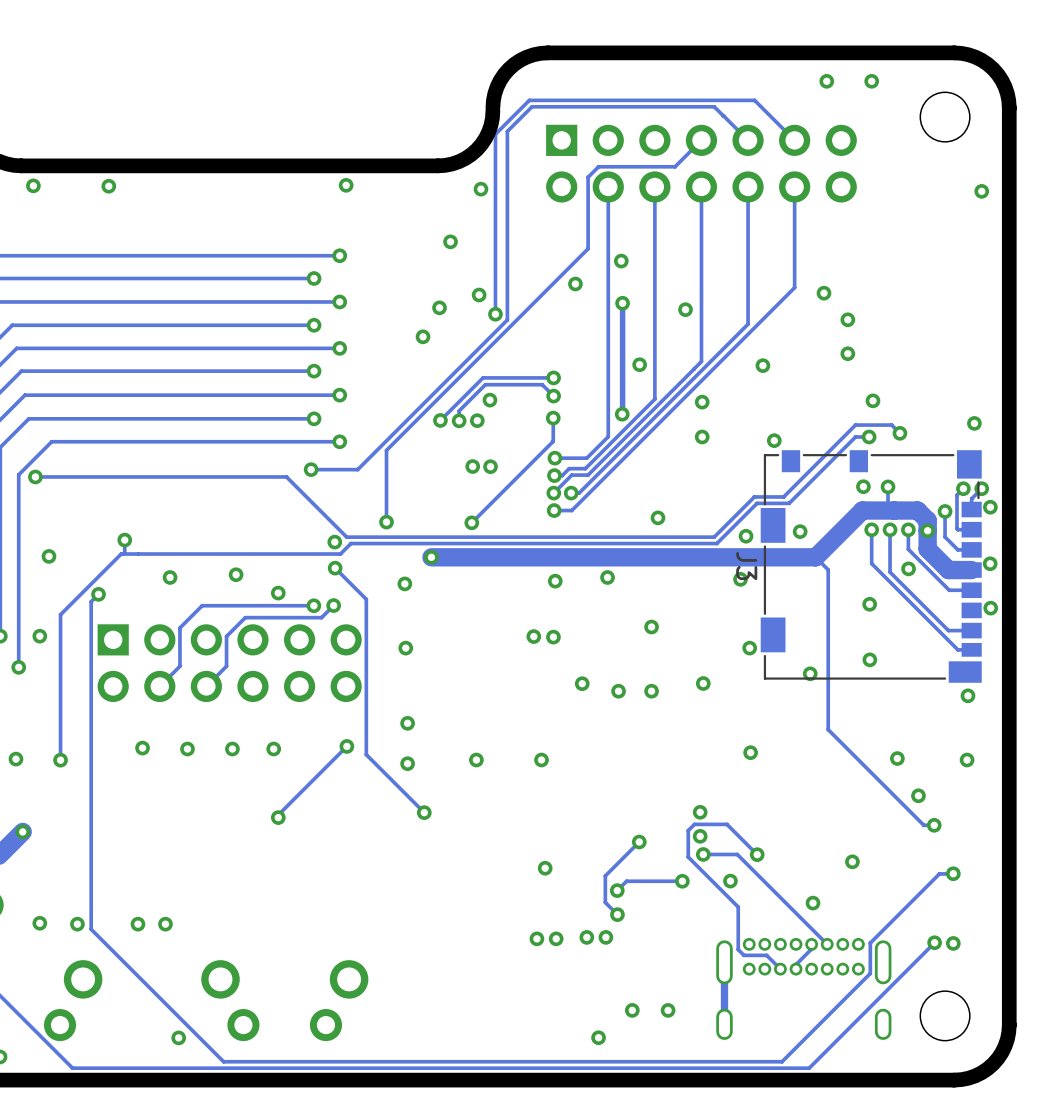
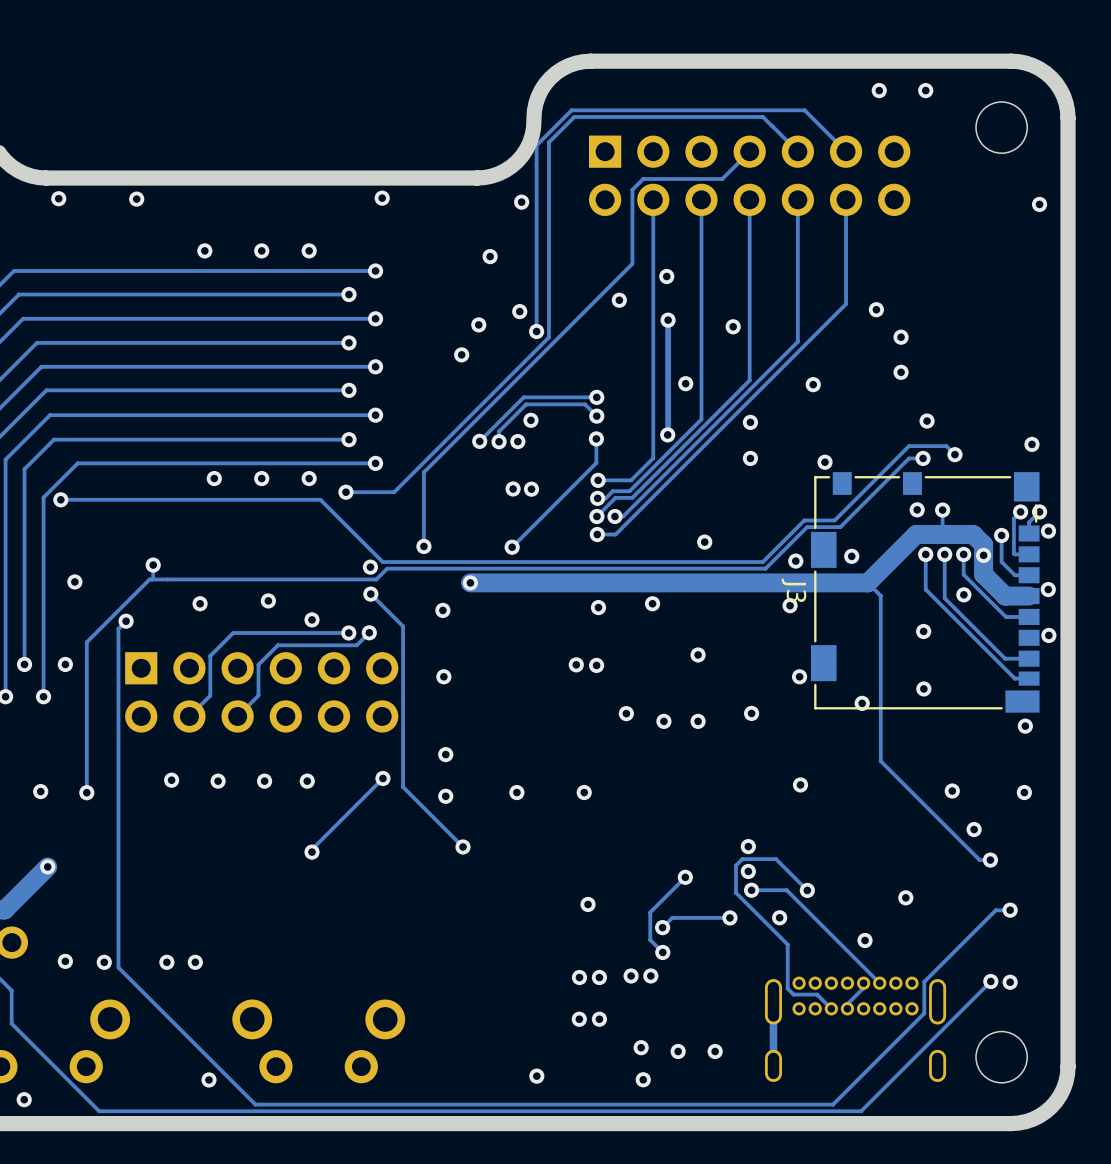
via: none -> (204, 250)
via: none -> (261, 250)
via: none -> (309, 250)
via: none -> (214, 478)
via: none -> (261, 478)
via: none -> (309, 478)
via: none -> (579, 1019)
via: none -> (599, 1019)
via: none -> (641, 1047)
via: none -> (536, 1076)

